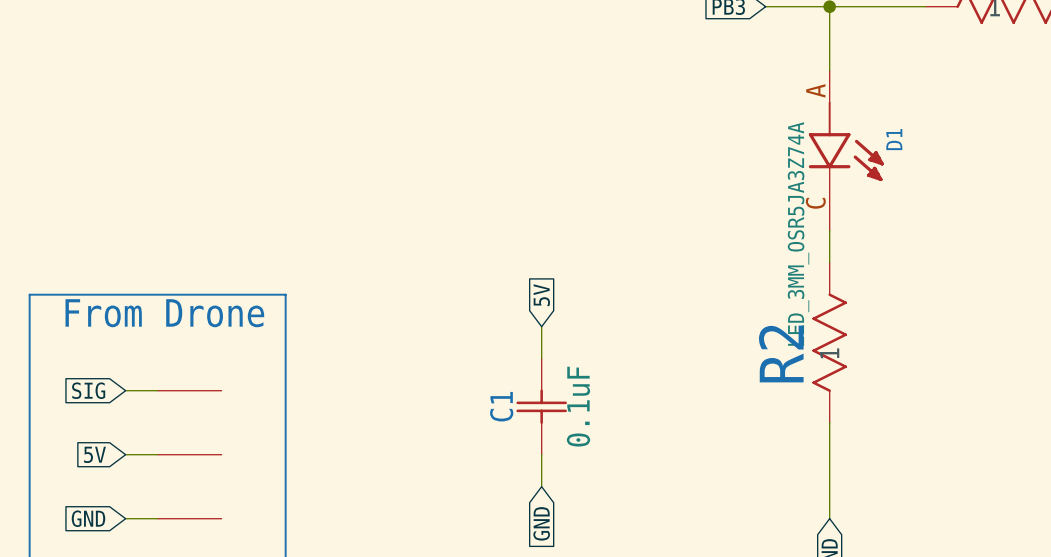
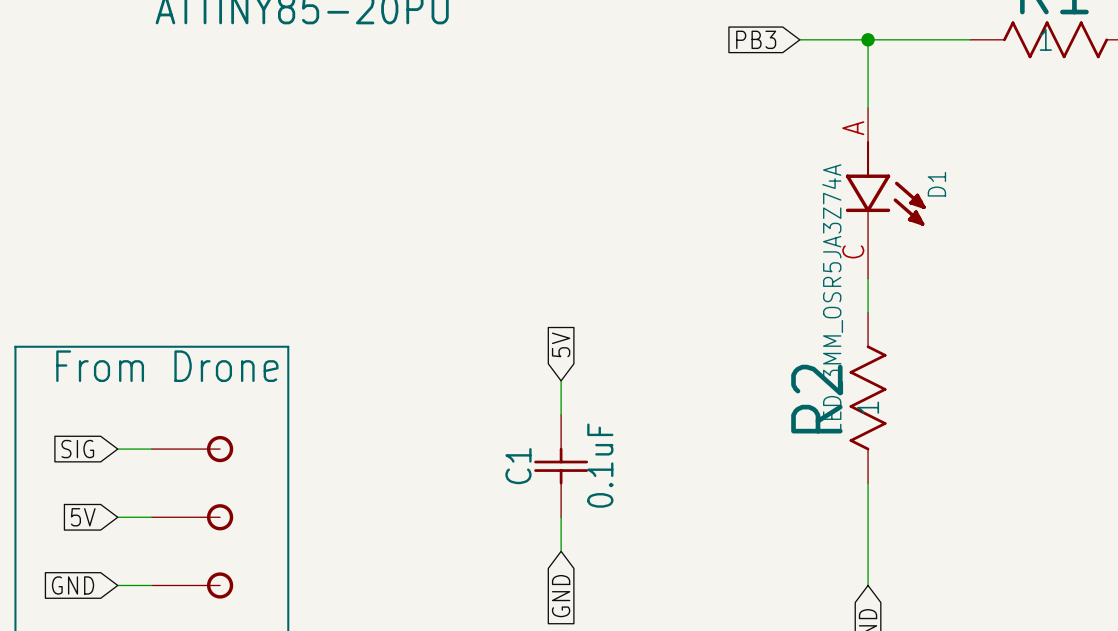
part symbol: [157, 390, 222, 391] -> [151, 435, 234, 463]
part symbol: [157, 454, 222, 455] -> [151, 504, 234, 531]
part symbol: [157, 518, 222, 519] -> [151, 572, 234, 599]

